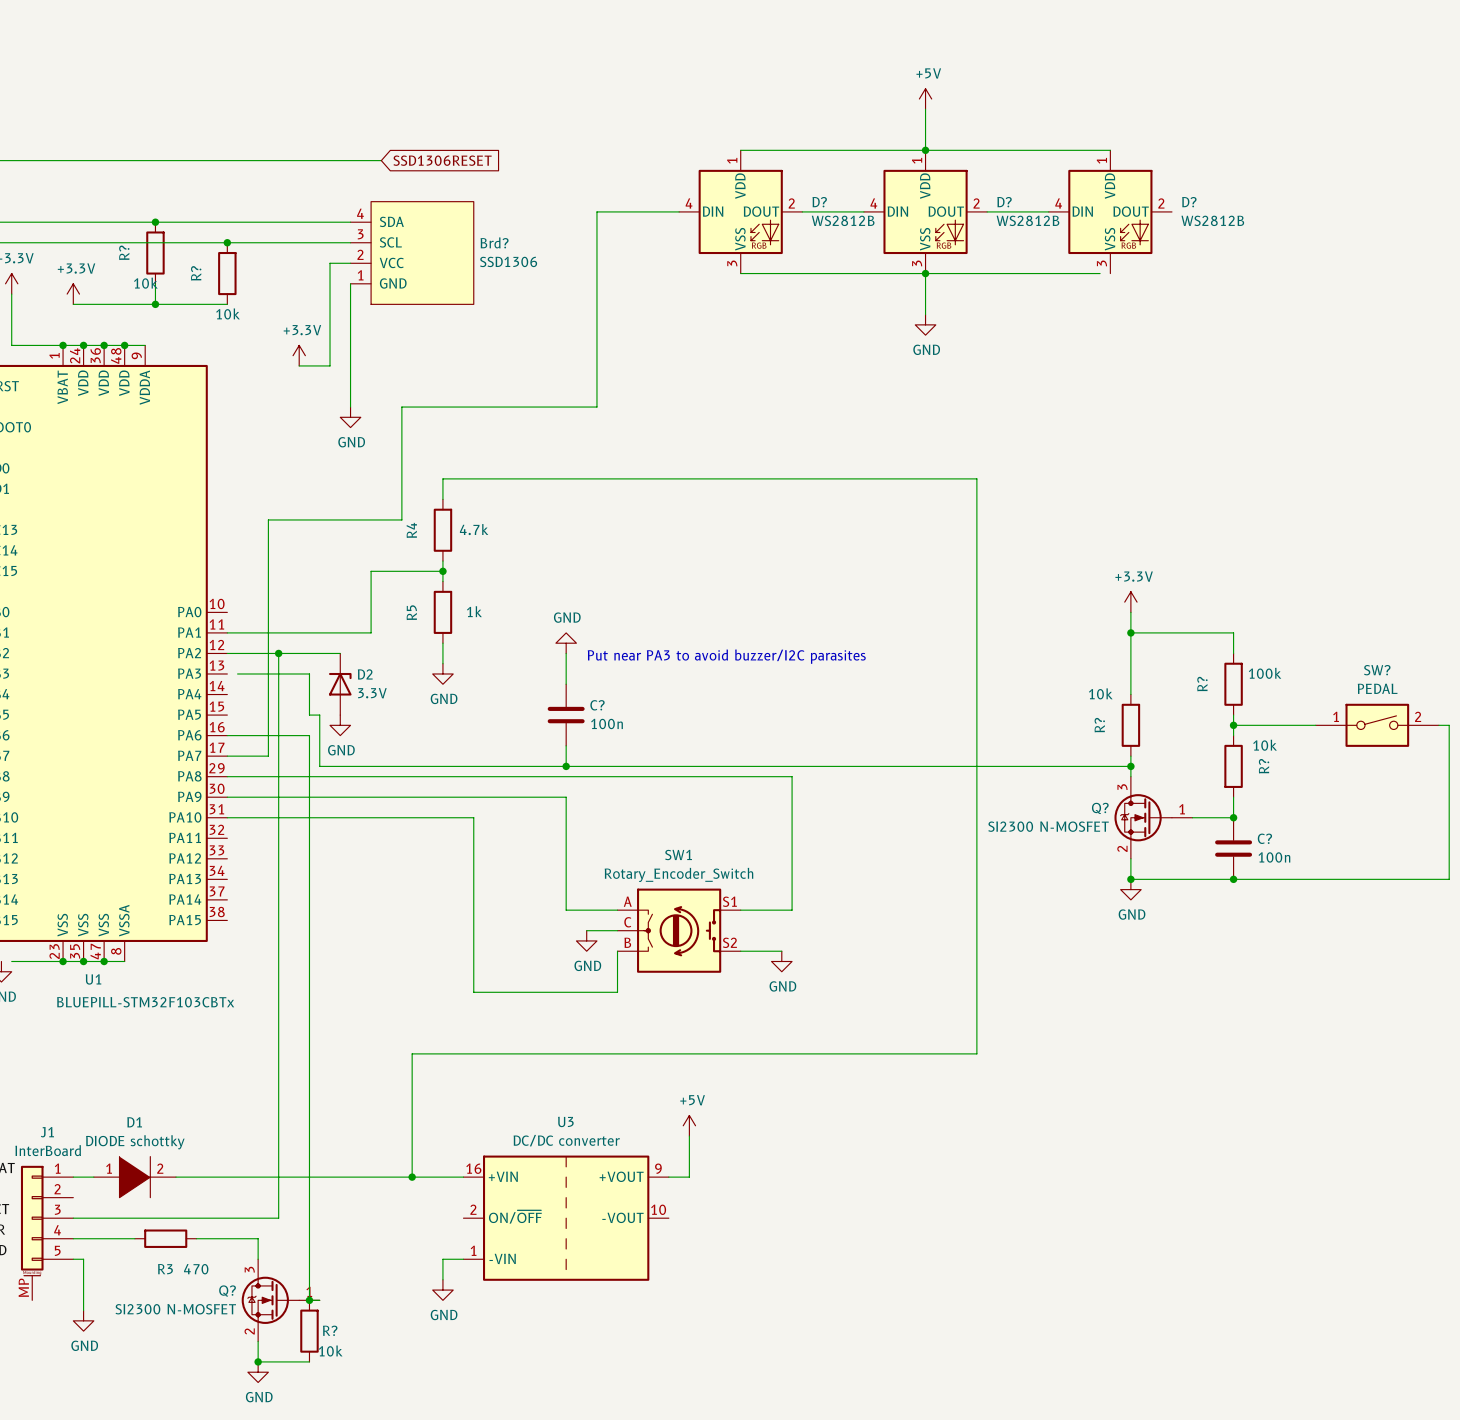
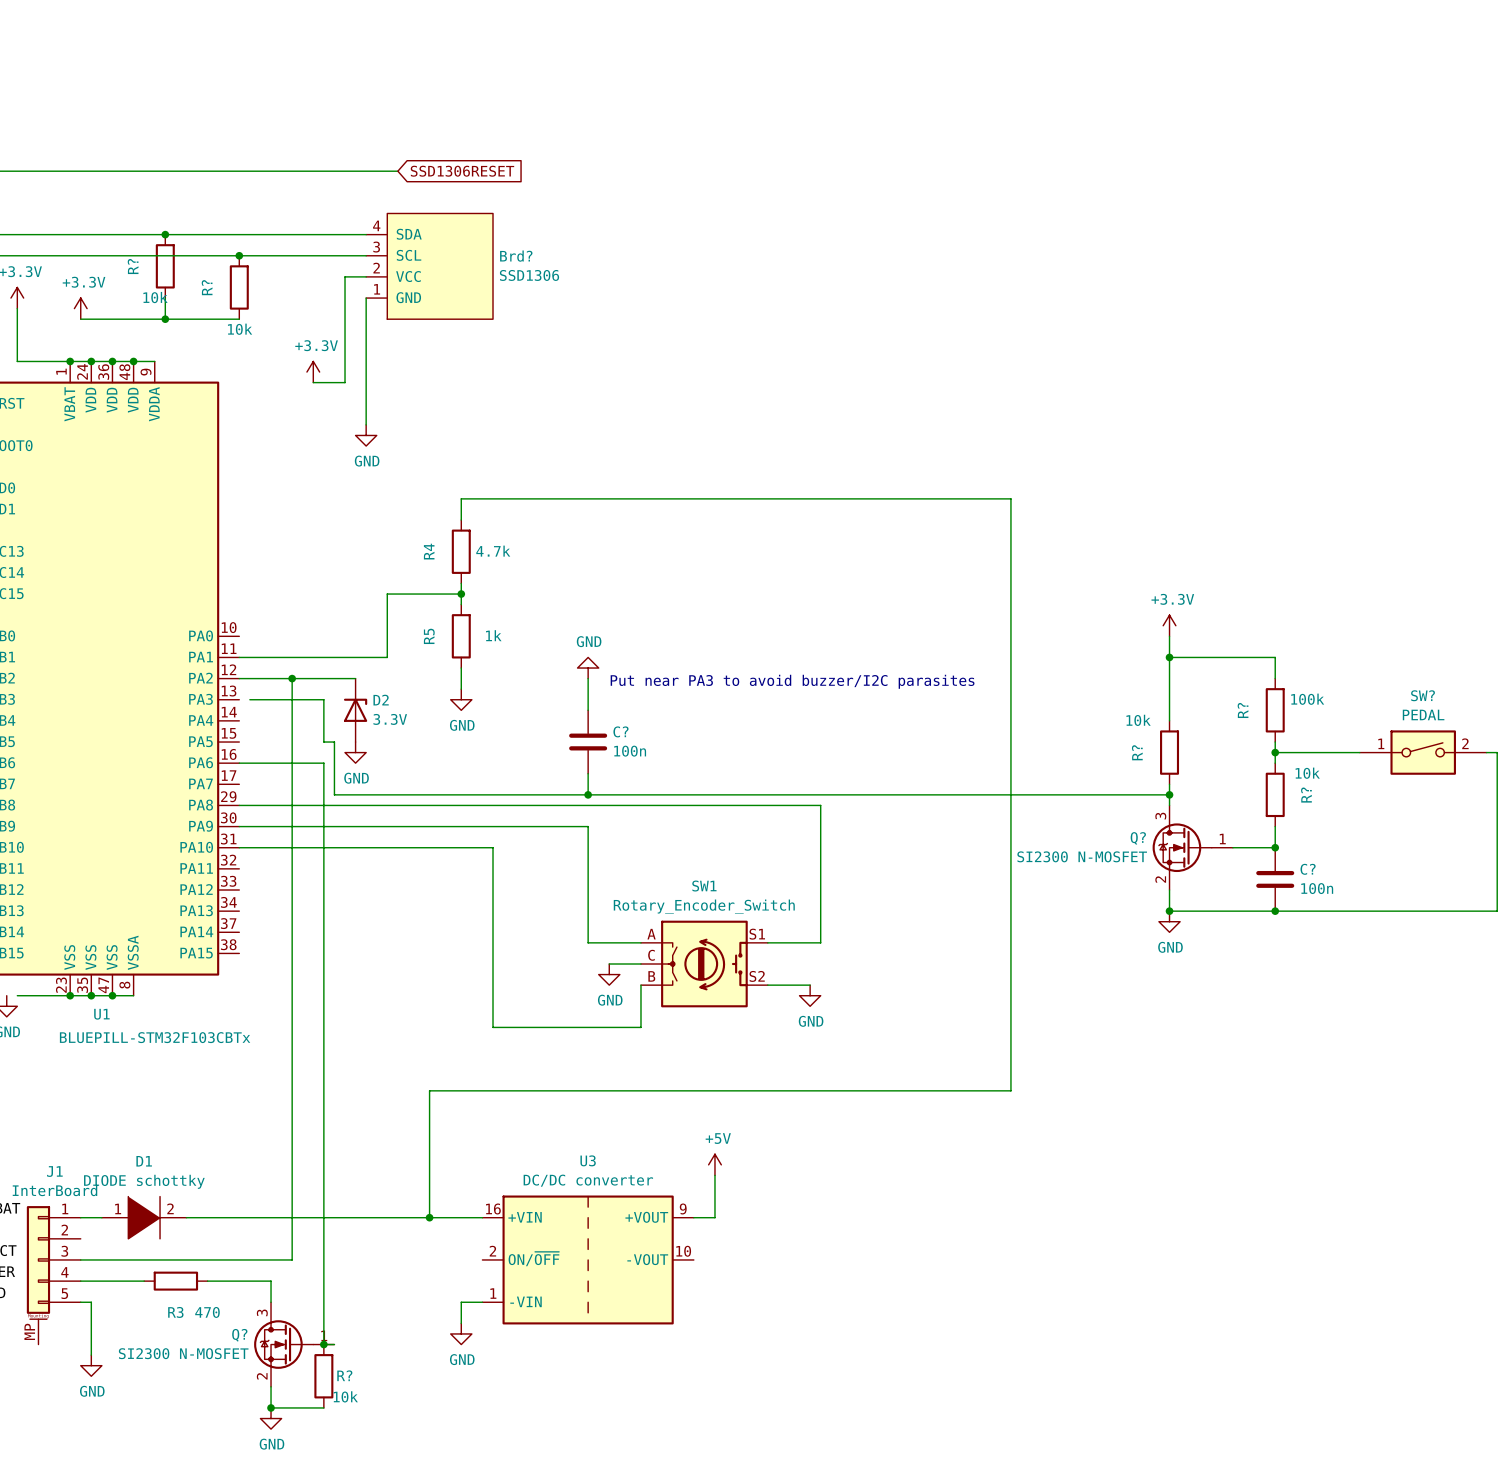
power symbol: +5V (925, 98) -> none
wire: (925, 109) (925, 150) -> none
wire: (740, 150) (1110, 150) -> none
junction: (925, 150) -> none
wire: (679, 211) (596, 211) (596, 407) (401, 407) (401, 519) (268, 519) (268, 756) (227, 756) -> none
D?: WS2812B (740, 211) -> none
wire: (802, 211) (863, 211) -> none
D?: WS2812B (925, 211) -> none
wire: (987, 211) (1048, 211) -> none
D?: WS2812B (1110, 211) -> none
wire: (740, 273) (1100, 273) -> none
wire: (925, 273) (925, 314) -> none
junction: (925, 273) -> none
power symbol: GND (925, 324) -> none

